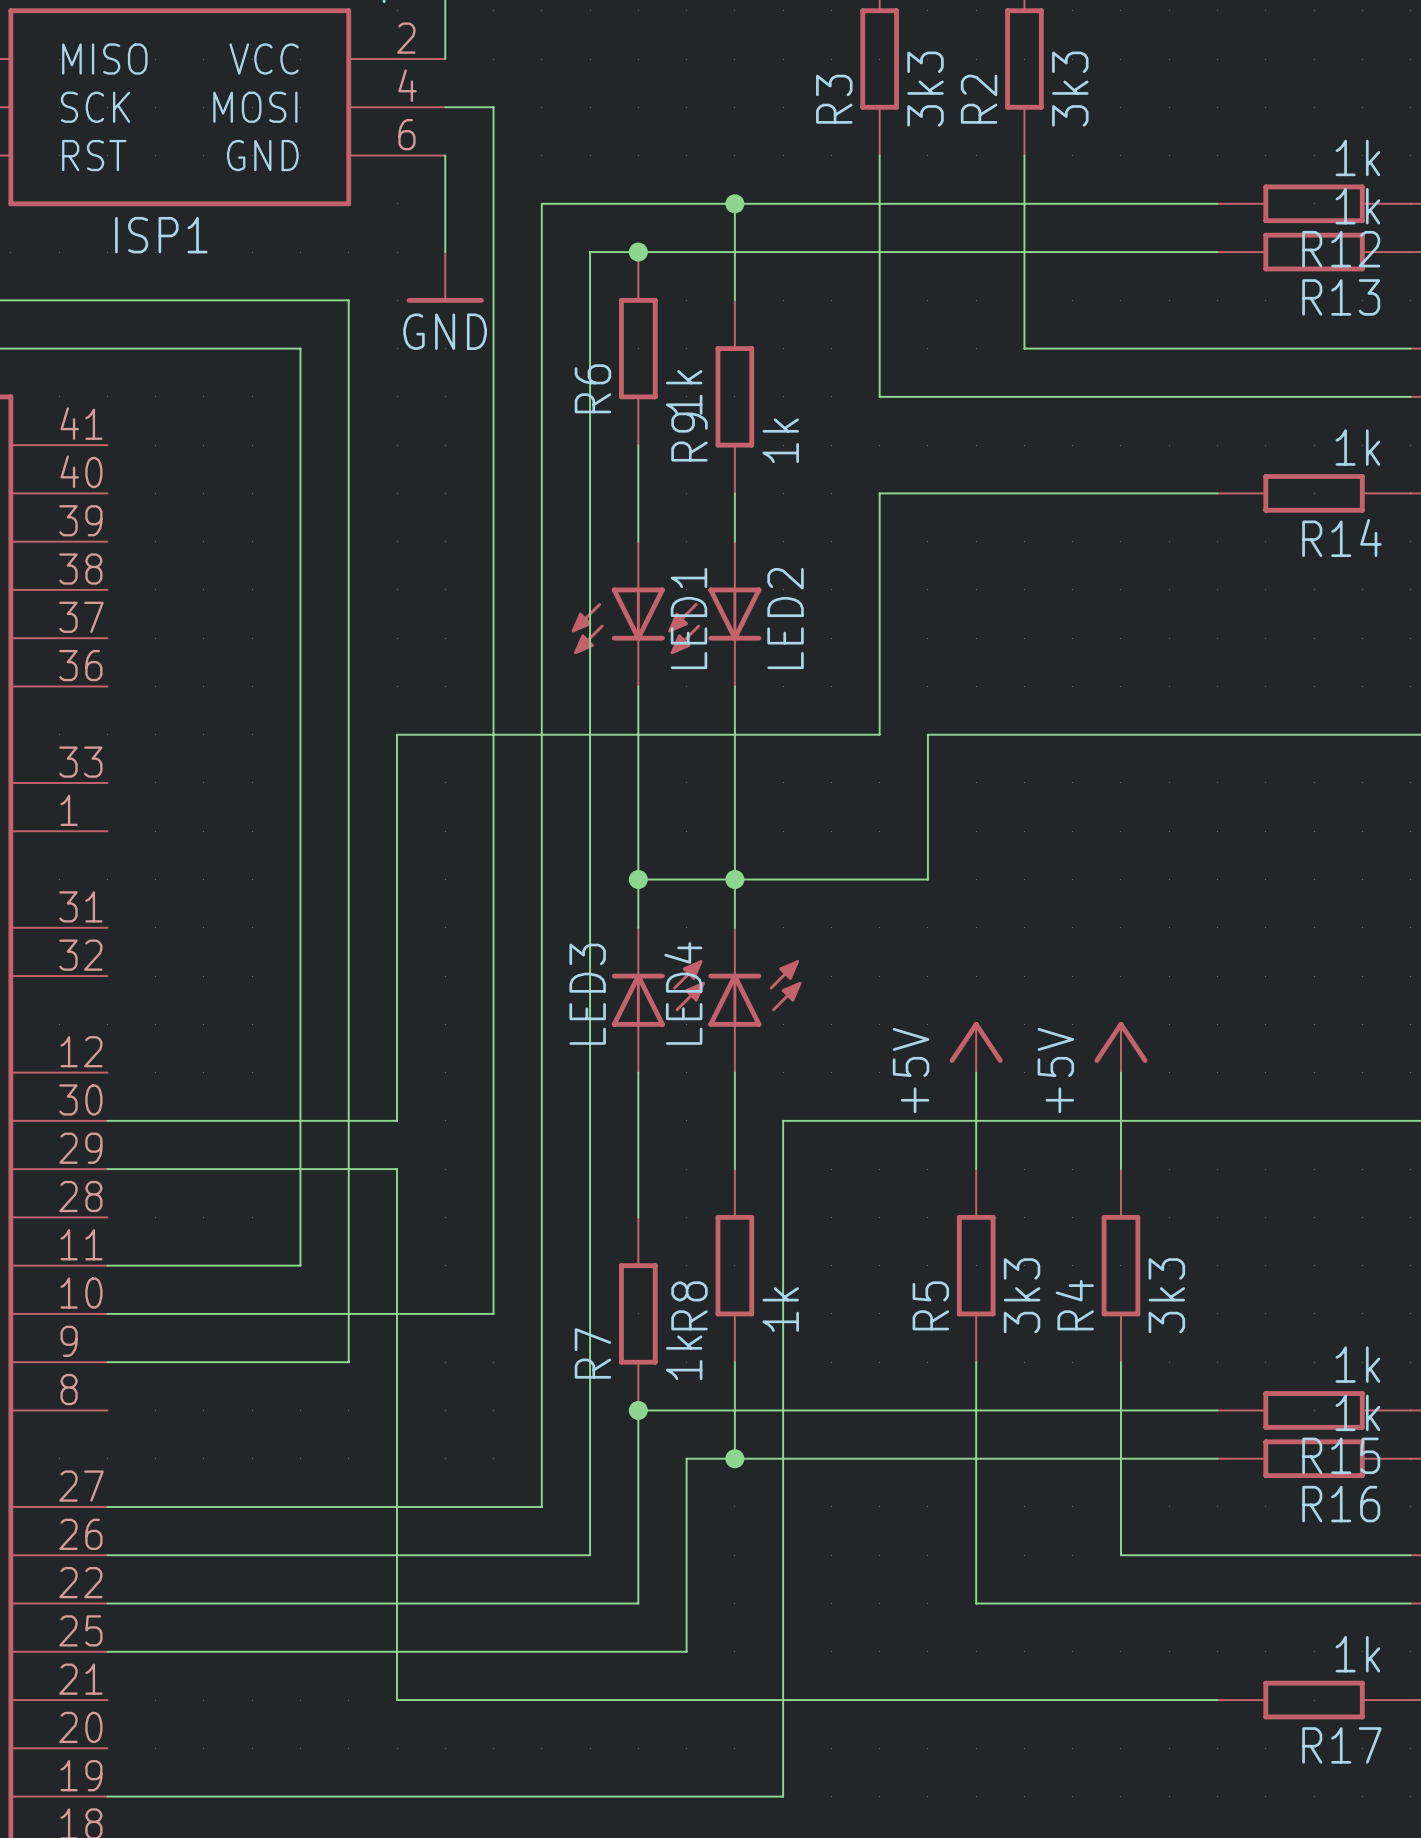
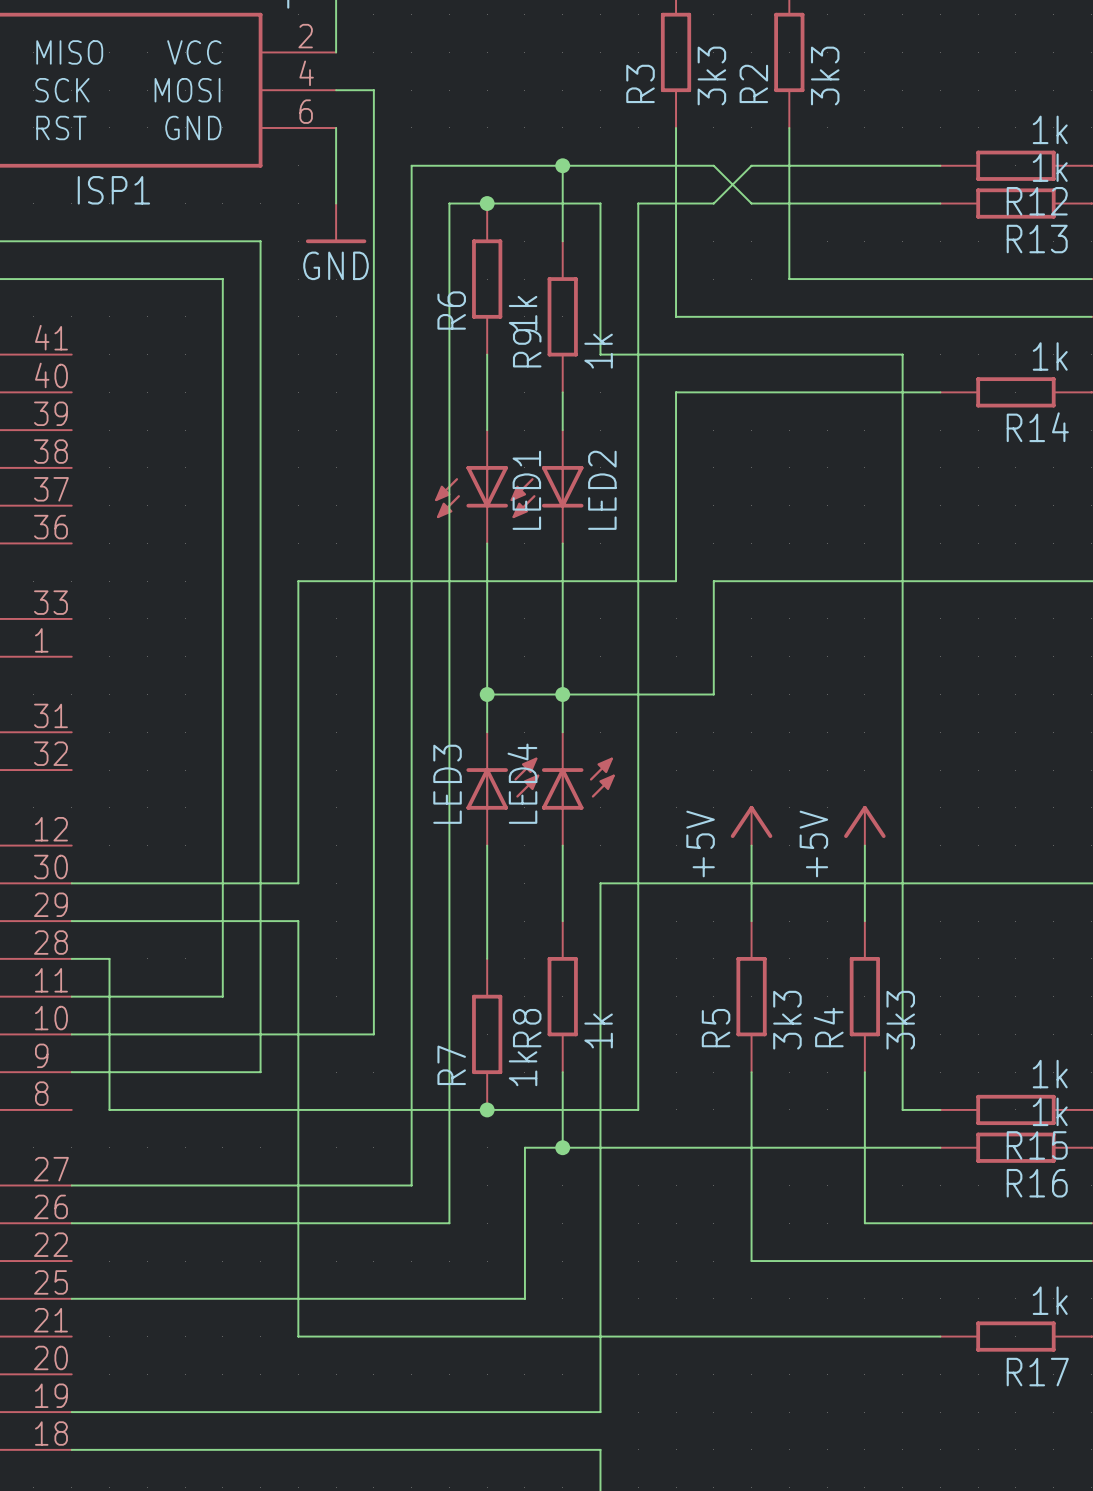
wire: (927, 203) (976, 203) -> (713, 165) (751, 203)
wire: (783, 252) (831, 252) -> (638, 1109) (638, 203)
wire: (927, 252) (976, 252) -> (713, 203) (751, 165)
wire: (638, 1410) (638, 1603) (107, 1603) -> (487, 1109) (109, 1109) (109, 958) (71, 958)
wire: (831, 1410) (1169, 1410) -> (600, 203) (600, 354) (902, 354) (902, 1109)

